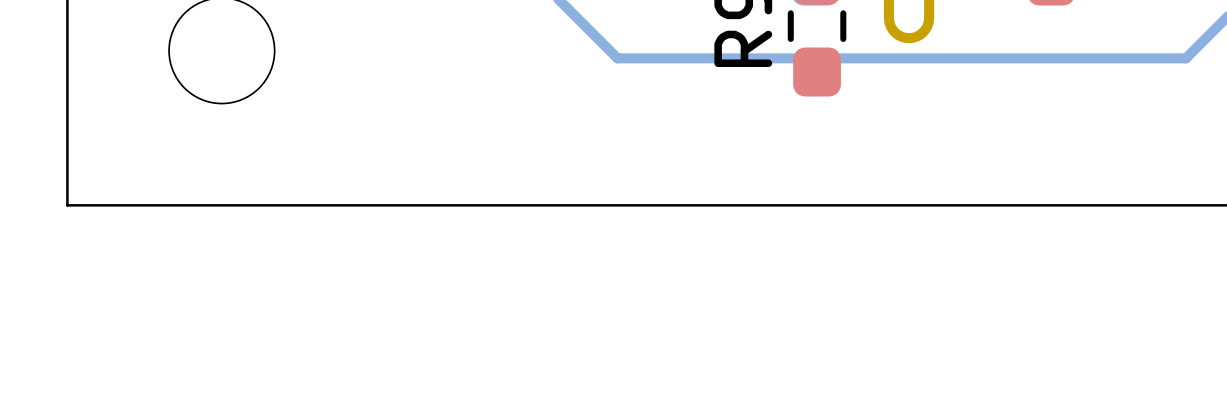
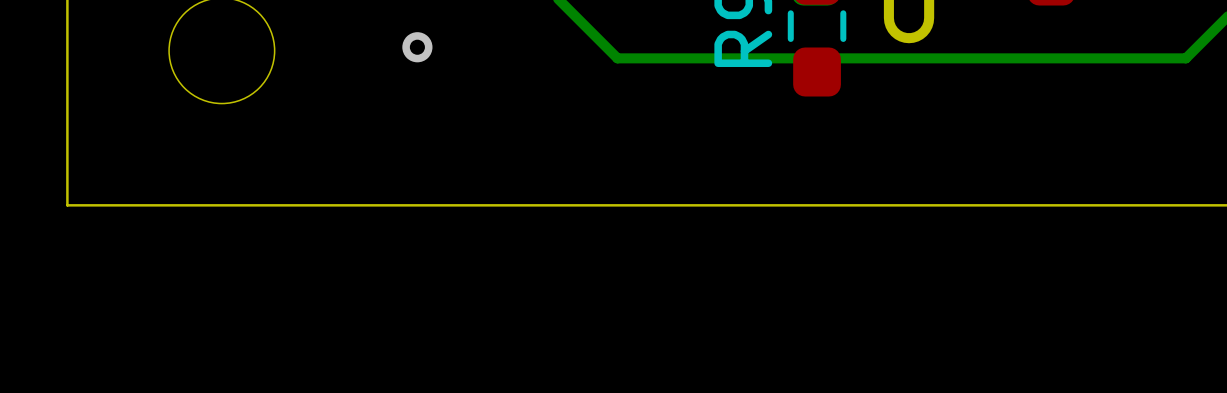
via: none -> (417, 47)

